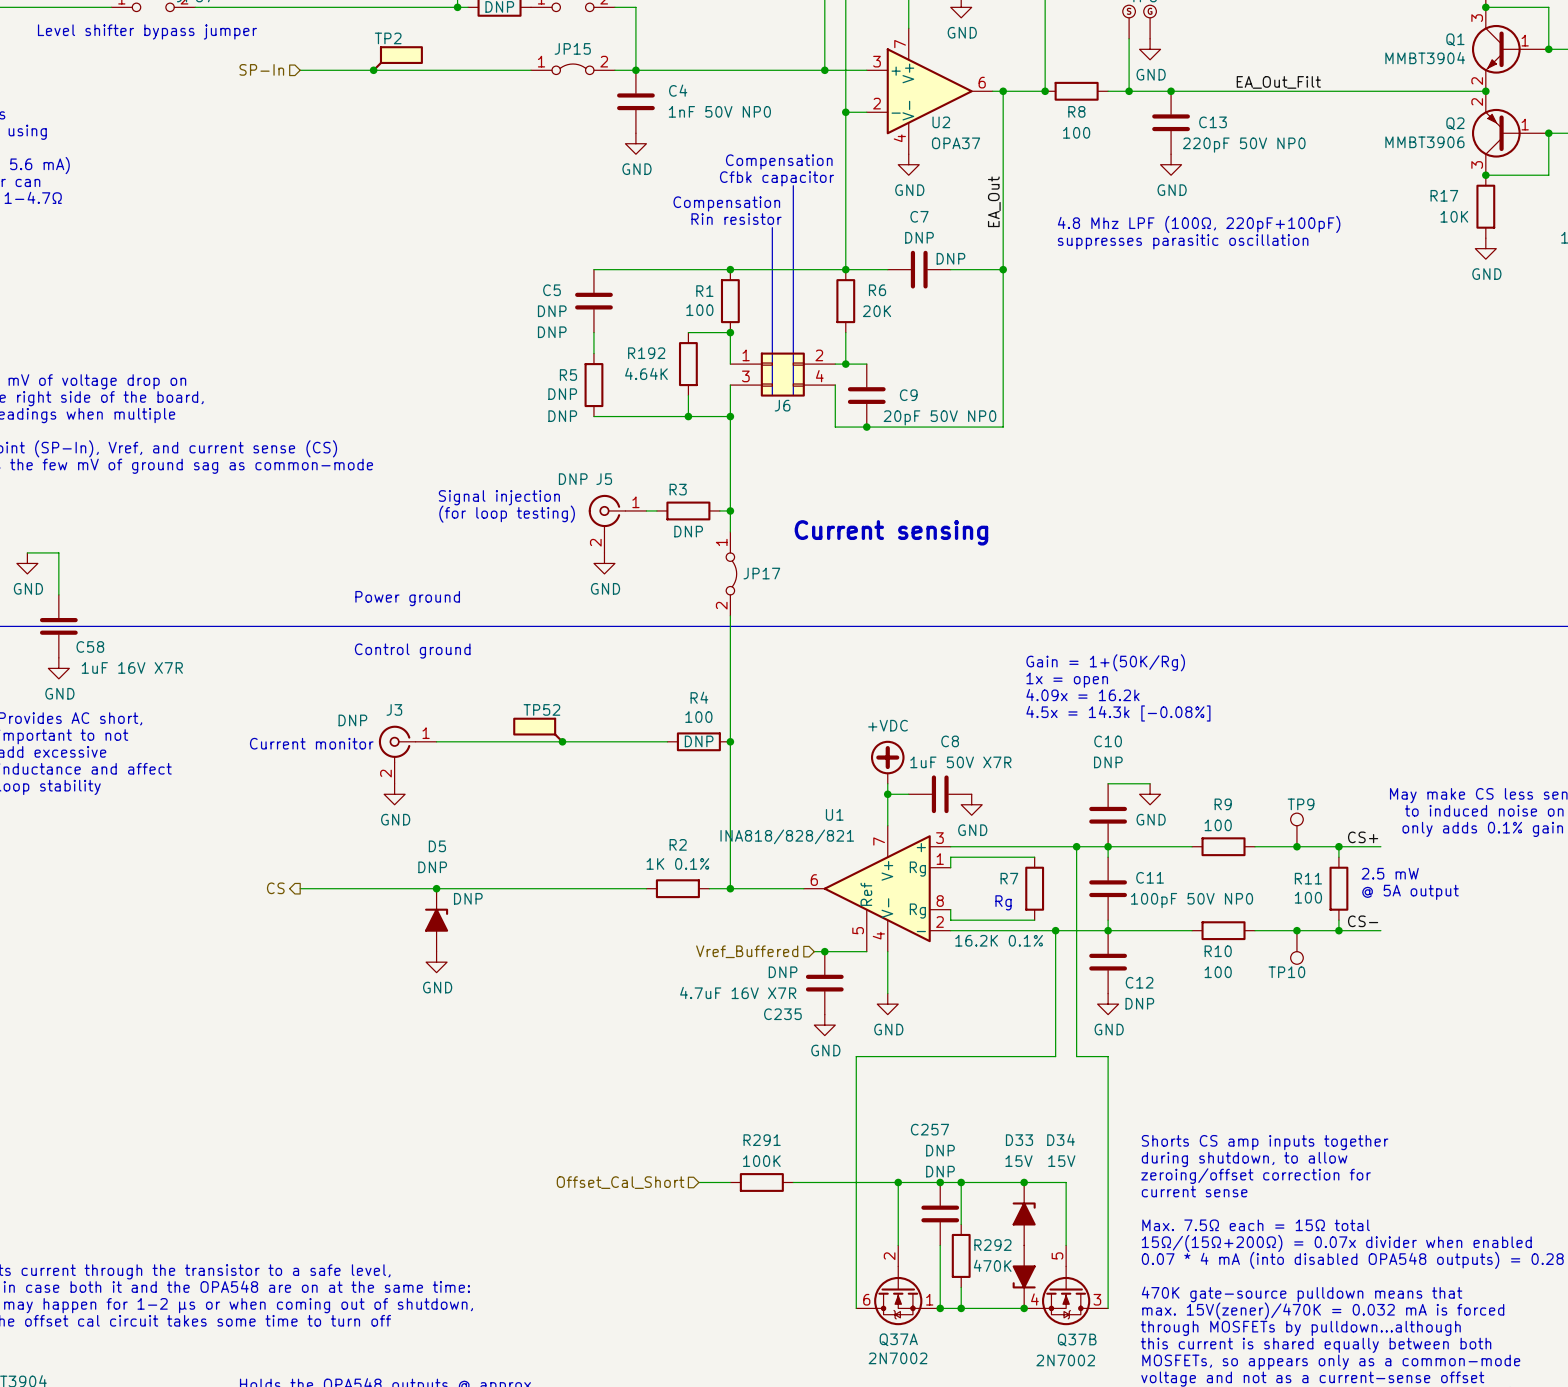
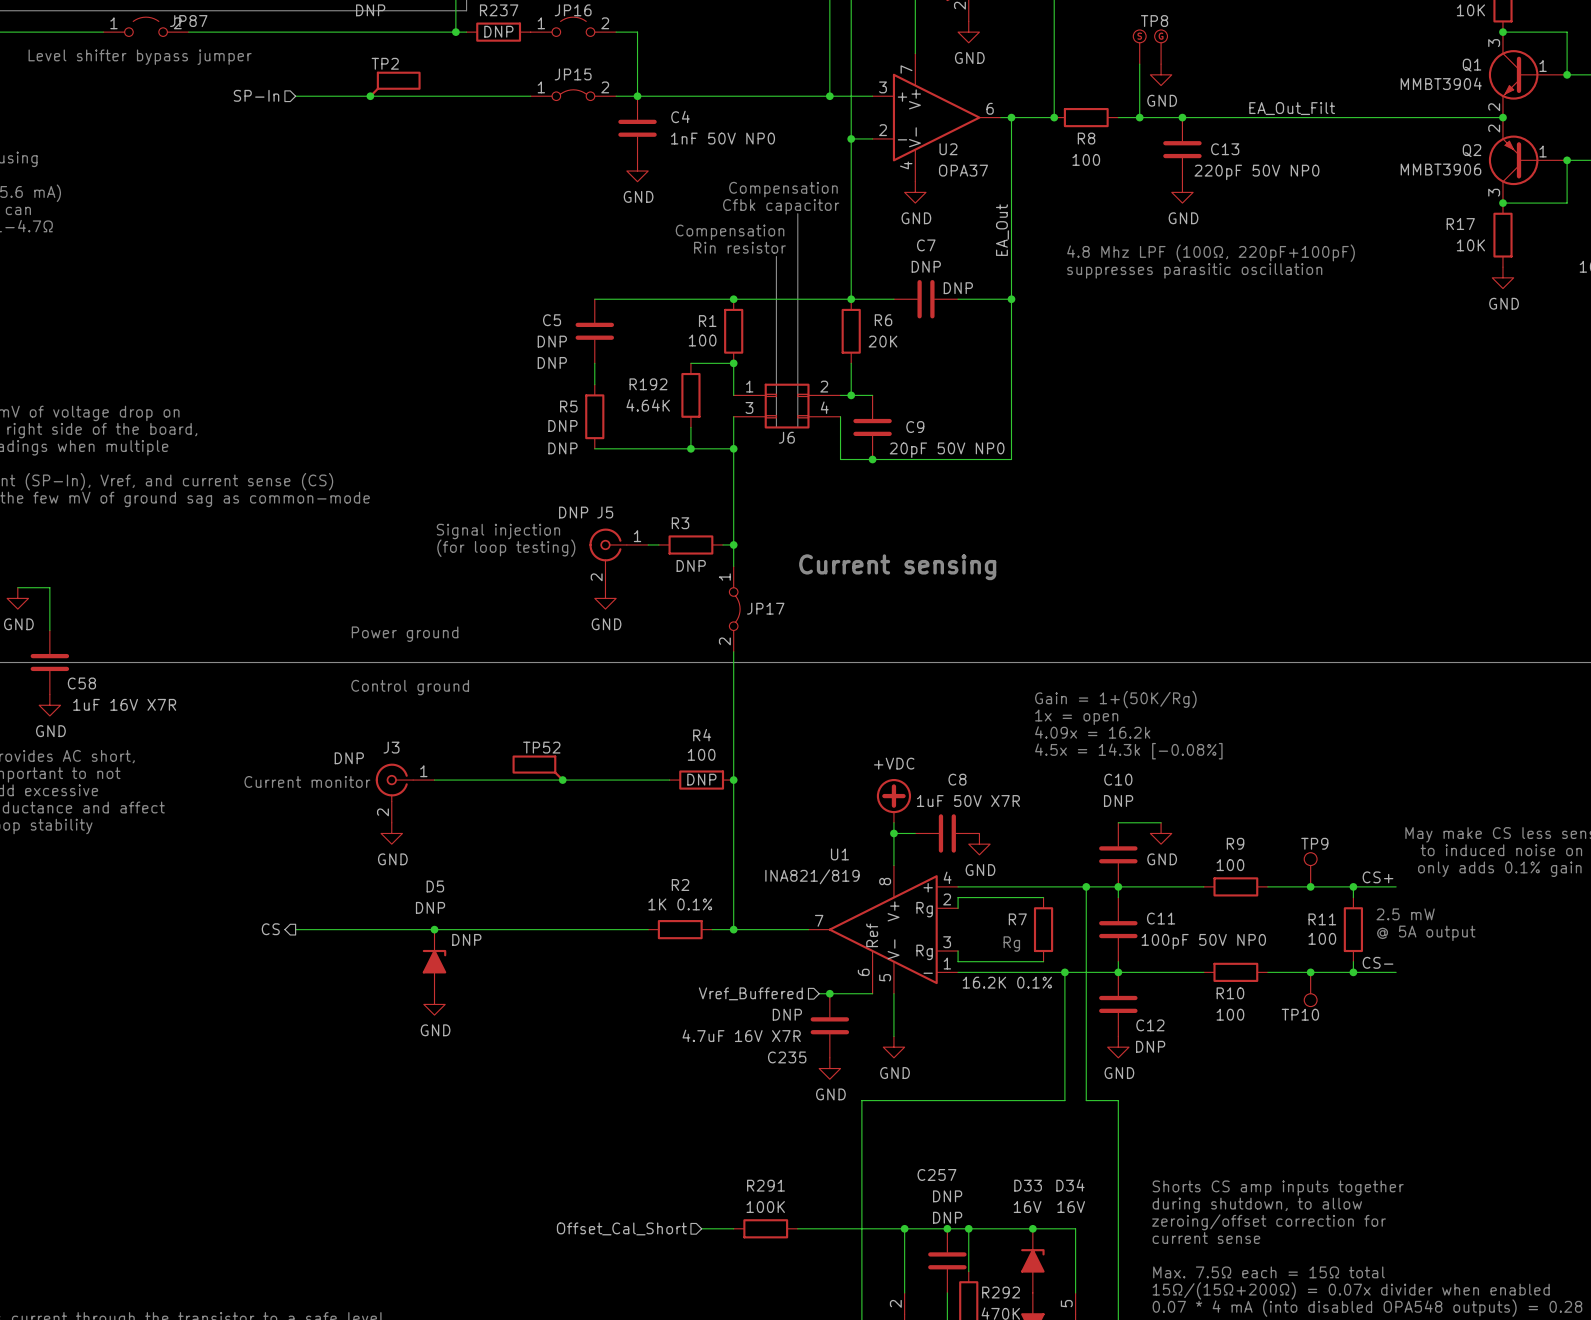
U1 value: INA818/828/821 (787, 836) -> INA821/819 (812, 876)
U1 pin number: 3 (939, 838) -> 4 (947, 877)
U1 pin number: 7 (879, 841) -> 8 (885, 881)
U1 pin number: 1 (940, 859) -> 2 (947, 899)
U1 pin number: 6 (814, 880) -> 7 (819, 920)
U1 pin number: 8 (940, 901) -> 3 (947, 942)
U1 pin number: 2 (939, 922) -> 1 (947, 963)
U1 pin number: 5 (858, 930) -> 6 (863, 972)
U1 pin number: 4 (878, 935) -> 5 (885, 977)
D33 value: 15V (1018, 1161) -> 16V (1027, 1207)
D34 value: 15V (1061, 1161) -> 16V (1071, 1207)

